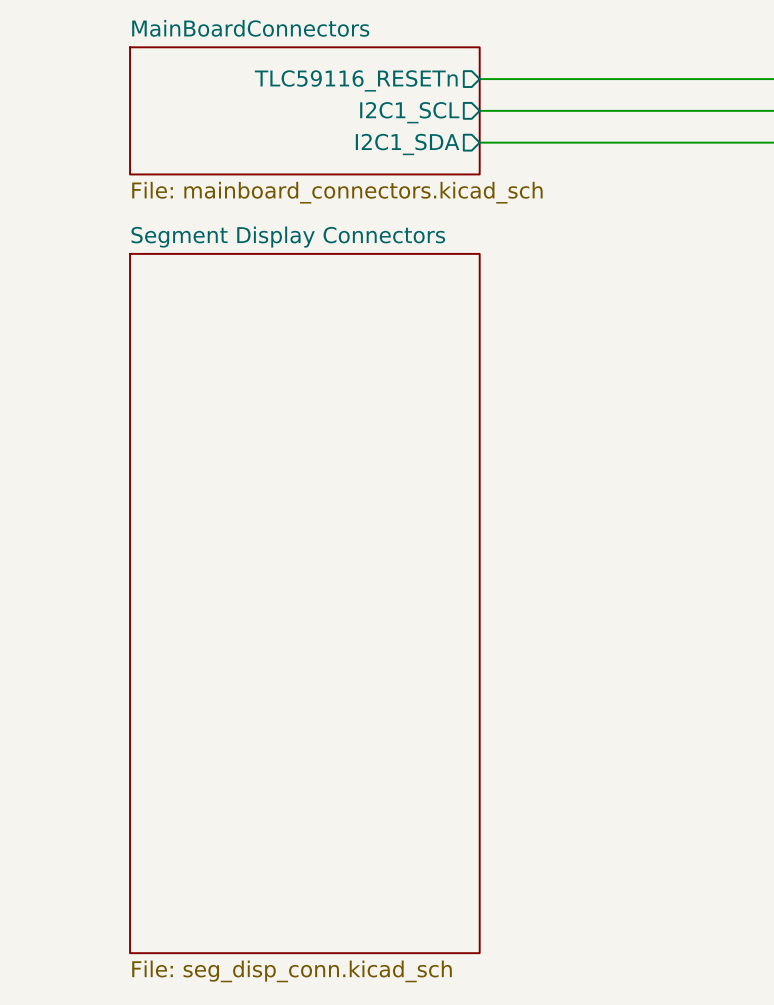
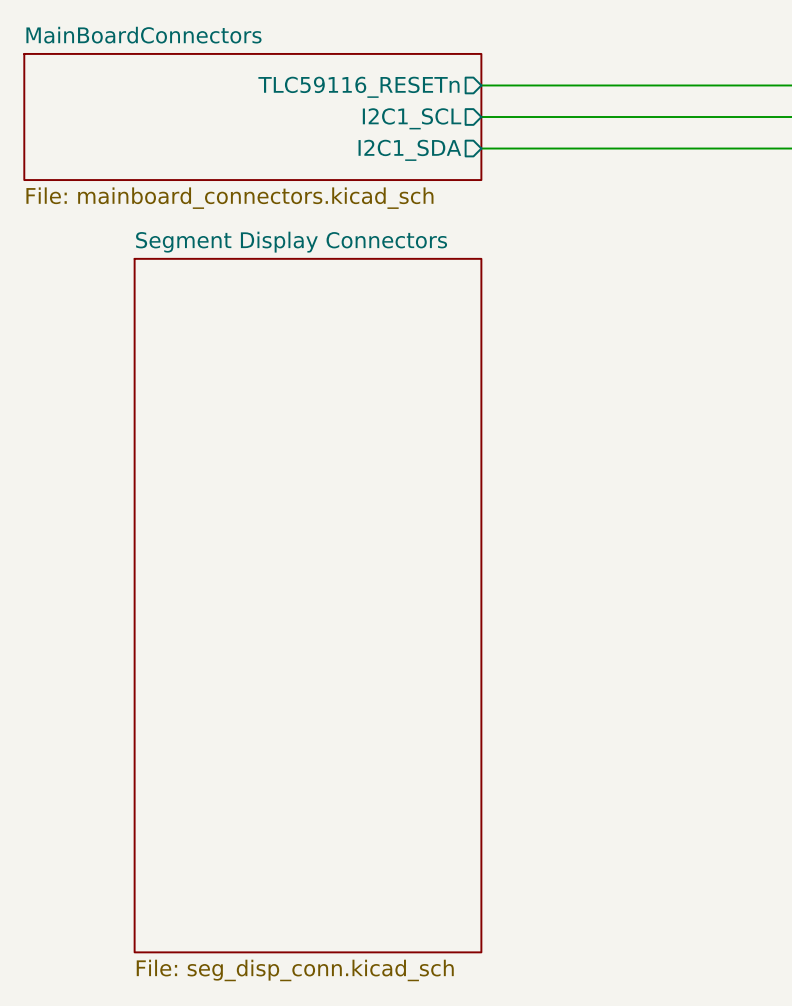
sheet MainBoardConnectors: none -> File: mainboard_connectors.kicad_sch (252, 117)
sheet MainBoardConnectors: File: mainboard_connectors.kicad_sch (304, 110) -> none

